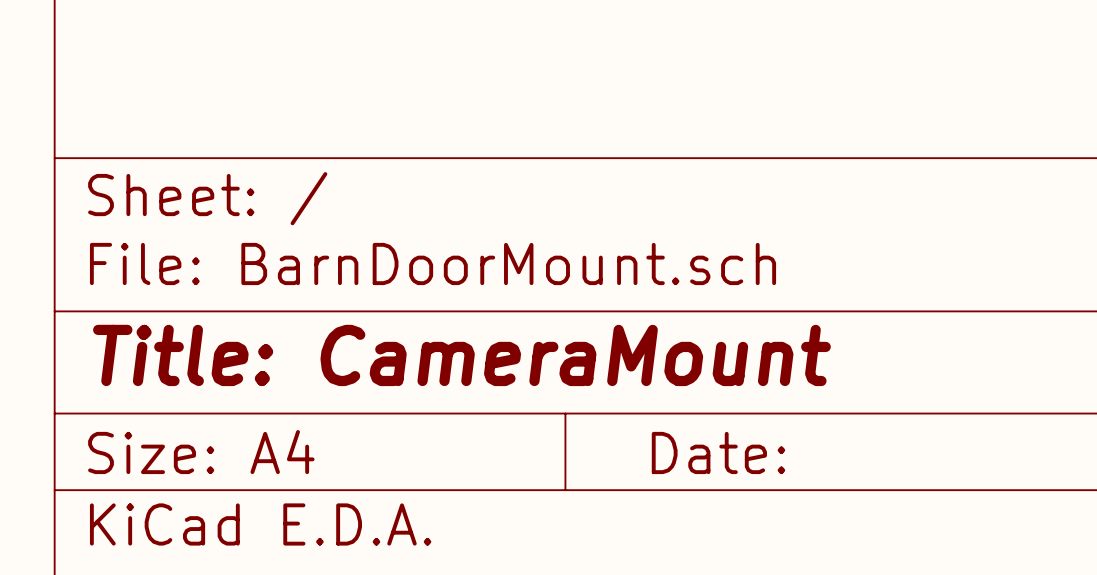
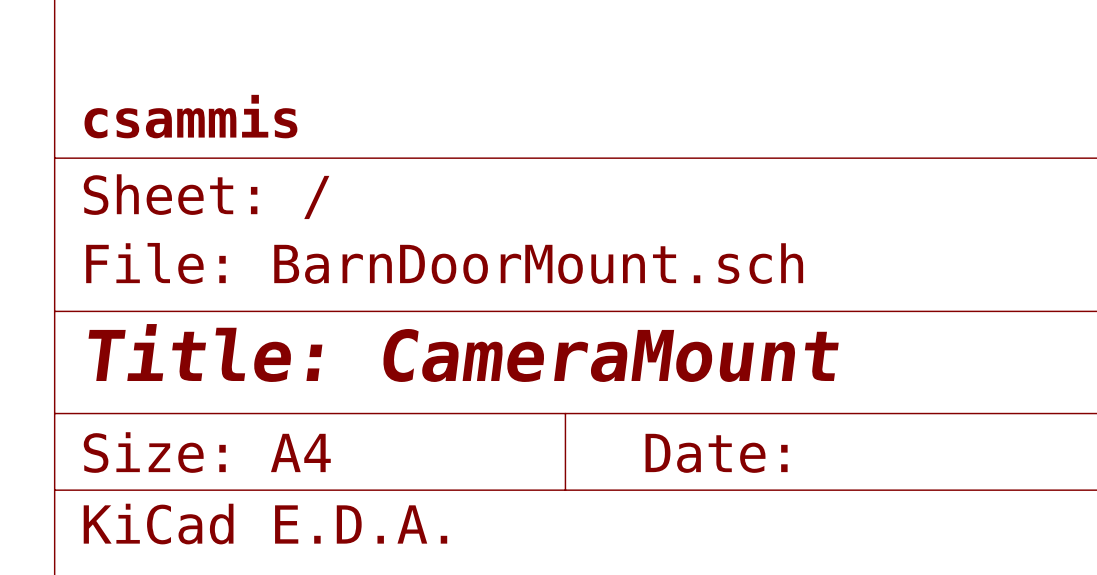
title block: none -> csammis (190, 116)

